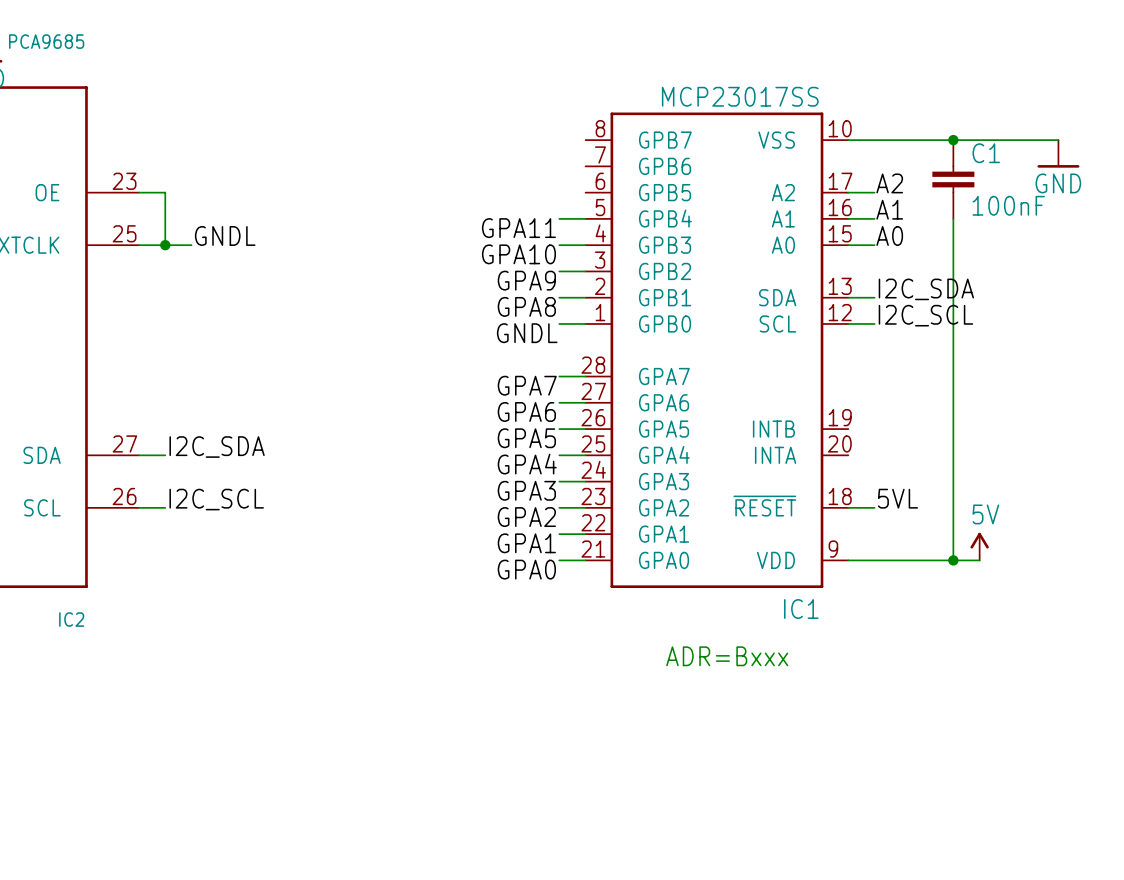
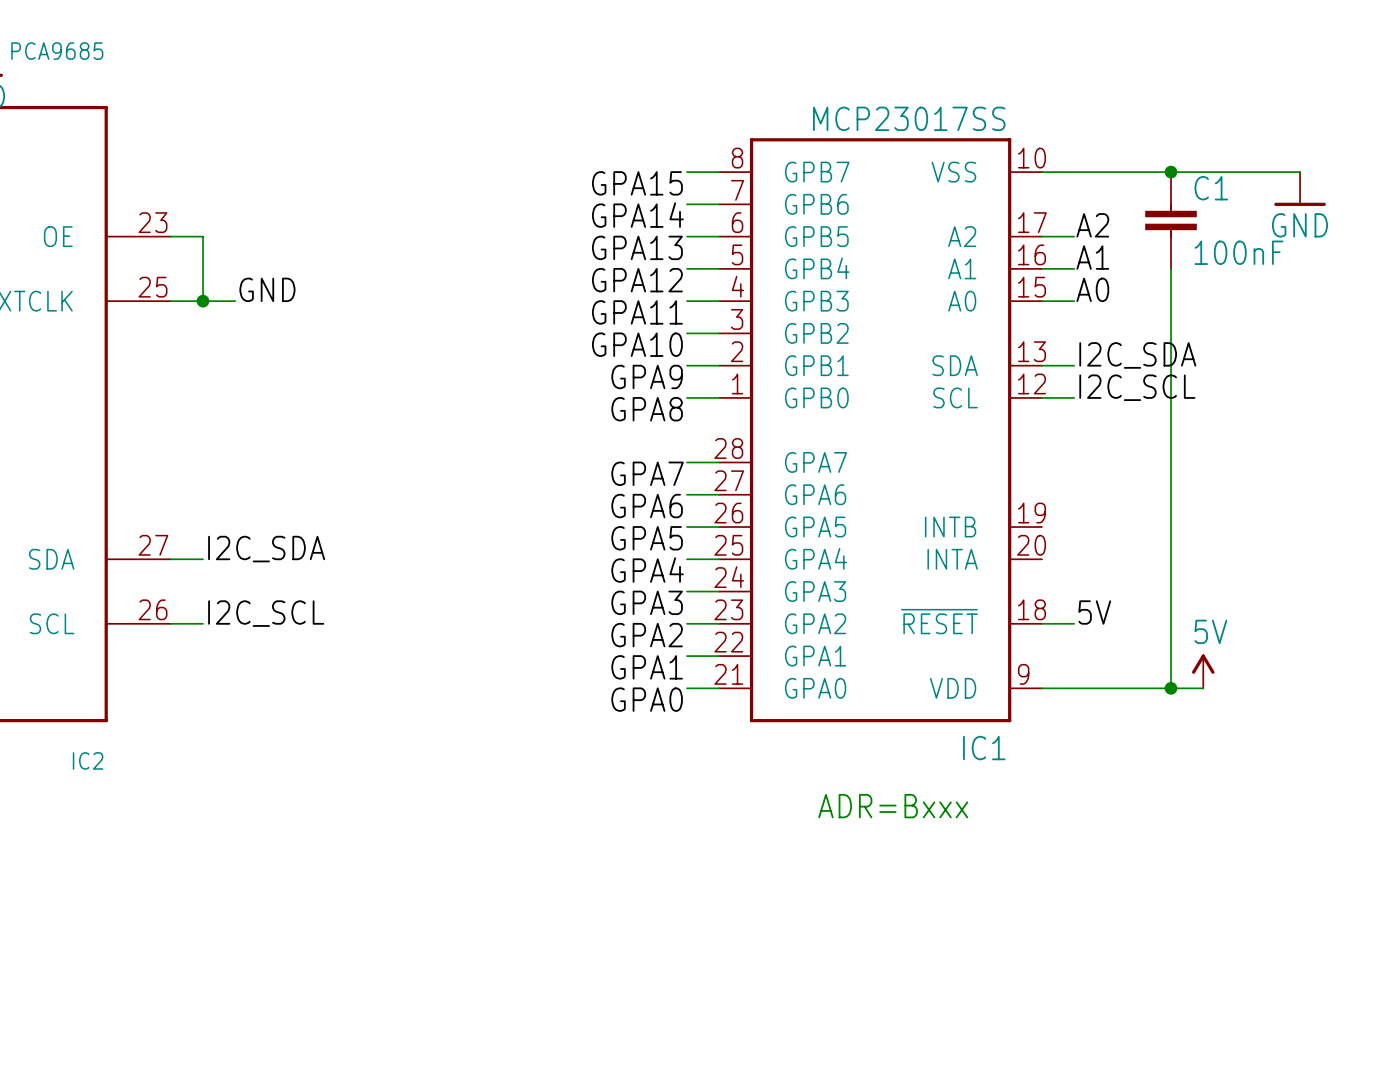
wire: none -> (687, 172) (719, 172)
label: none -> GPA15 (637, 183)
wire: none -> (687, 204) (719, 204)
label: none -> GPA14 (637, 215)
wire: none -> (687, 236) (719, 236)
label: none -> GPA13 (637, 247)
label: GPA11 (518, 228) -> GPA12 (637, 280)
label: GNDL (225, 235) -> GND (267, 289)
label: GPA10 (518, 254) -> GPA11 (637, 312)
label: GPA9 (526, 280) -> GPA10 (637, 344)
label: GPA8 (526, 306) -> GPA9 (647, 376)
label: GNDL (527, 333) -> GPA8 (647, 409)
label: 5VL (897, 498) -> 5V (1094, 612)

